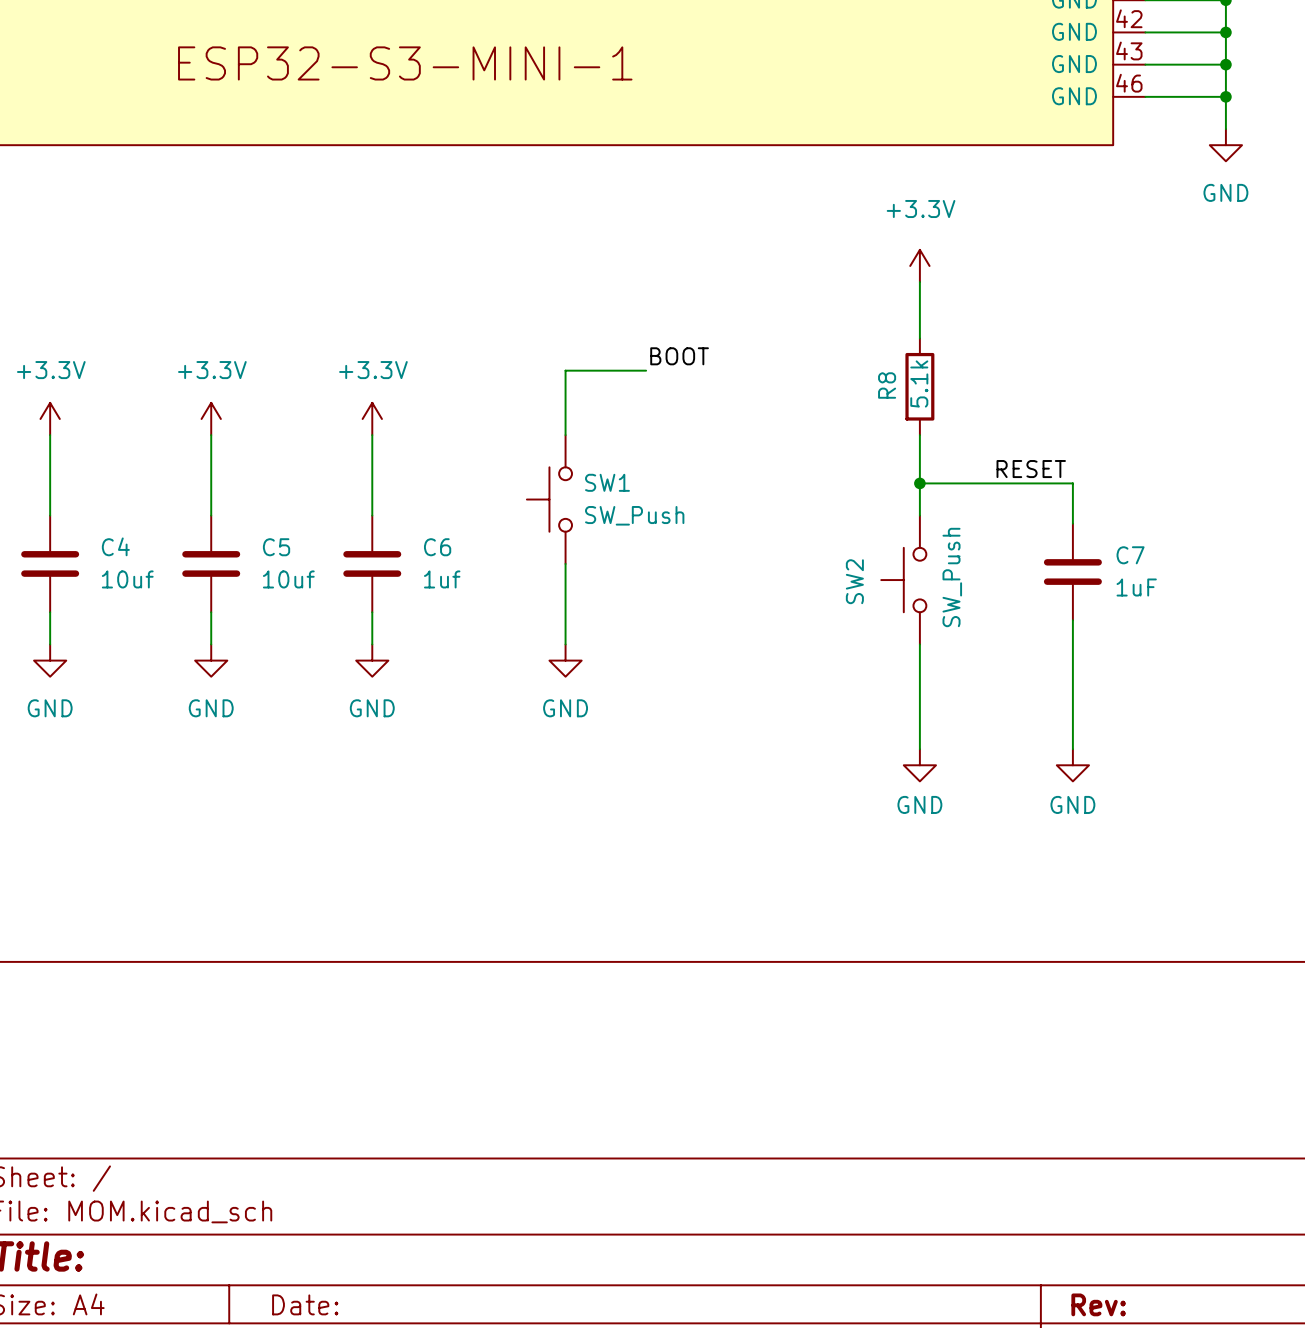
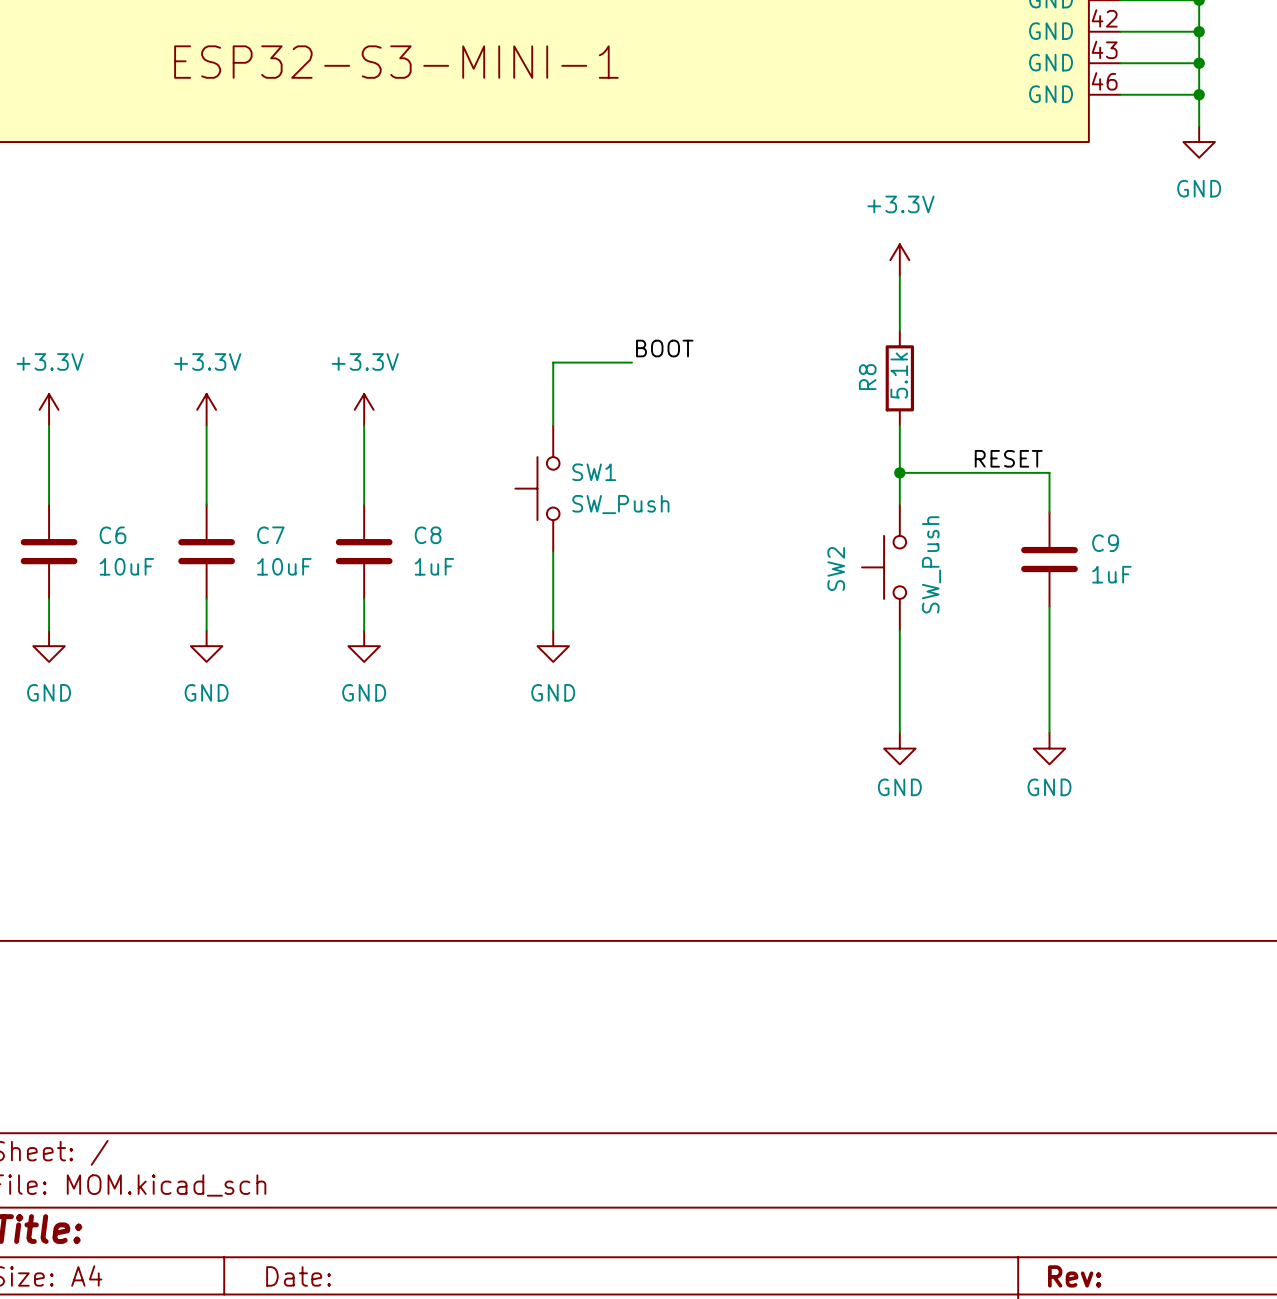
C4 name: C4 (115, 546) -> C6 (112, 535)
C5 name: C5 (276, 547) -> C7 (270, 535)
C6 name: C6 (437, 547) -> C8 (428, 535)
C7 name: C7 (1130, 555) -> C9 (1105, 543)
C4 value: 10uf (127, 579) -> 10uF (126, 566)
C5 value: 10uf (288, 579) -> 10uF (284, 566)
C6 value: 1uf (442, 579) -> 1uF (434, 566)

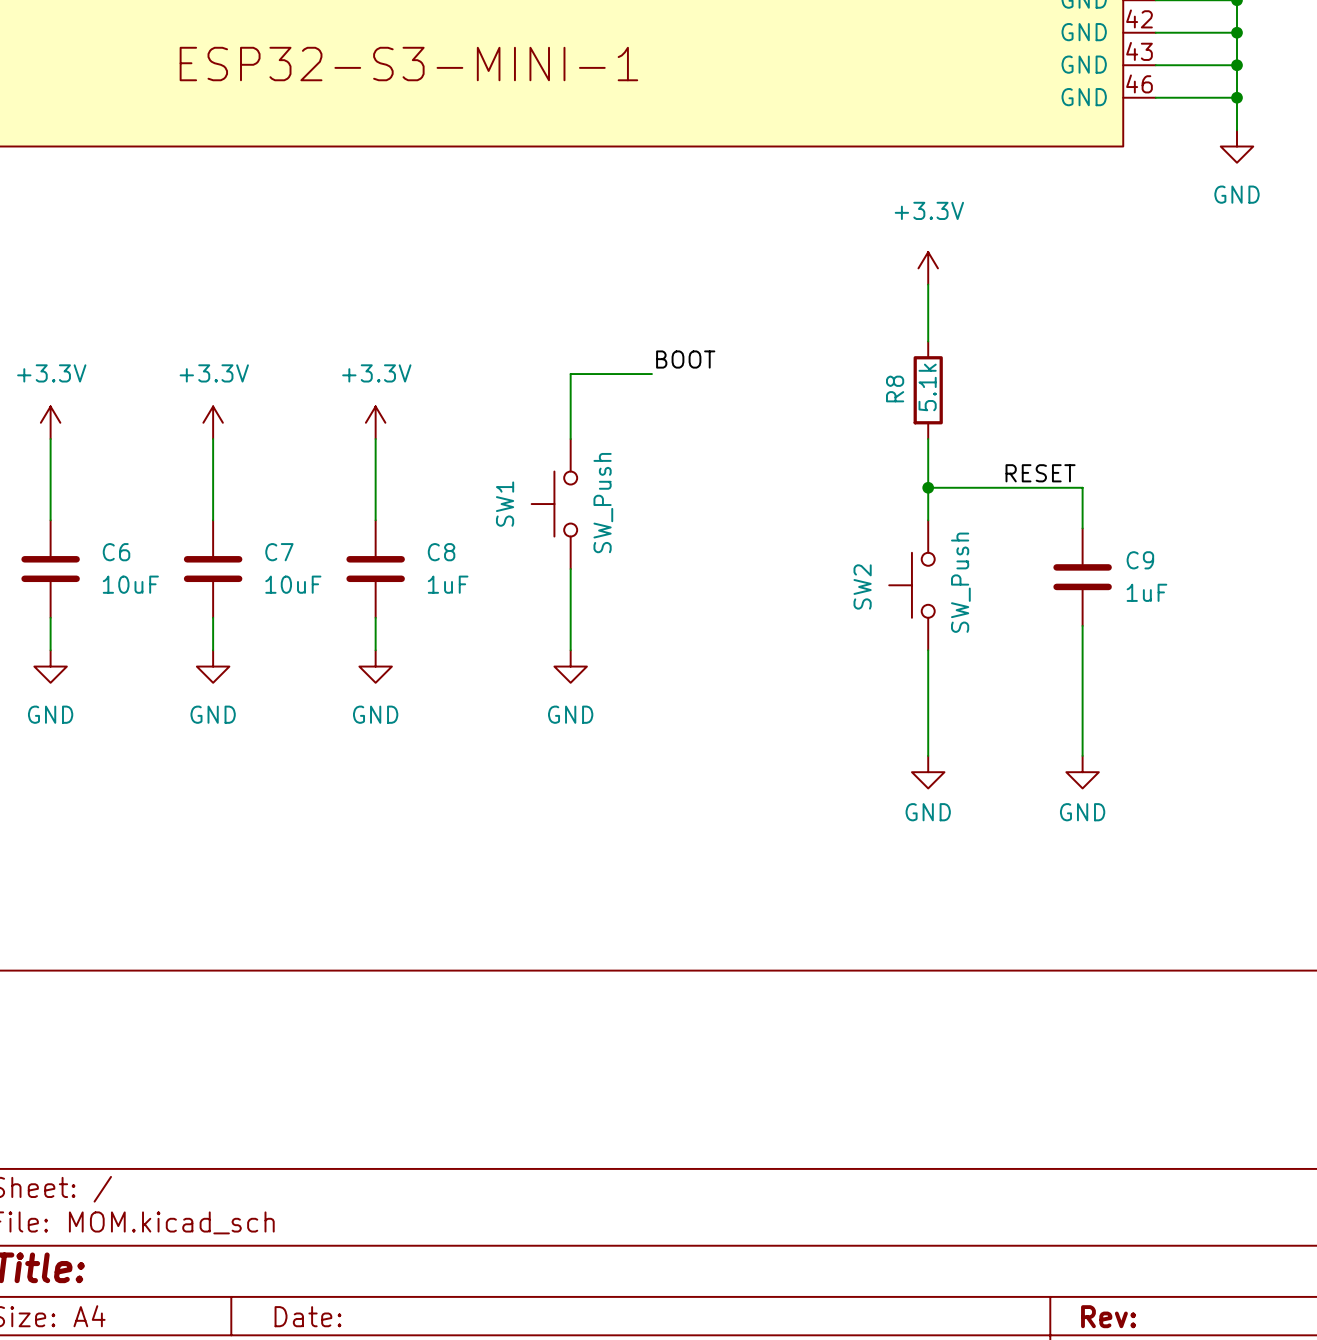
SW1 name rotation: 0° (594, 472) -> 90° counterclockwise (505, 504)
SW1 name position: SW1 (594, 472) -> SW1 (505, 504)
SW1 value rotation: 0° (620, 504) -> 90° counterclockwise (603, 503)

